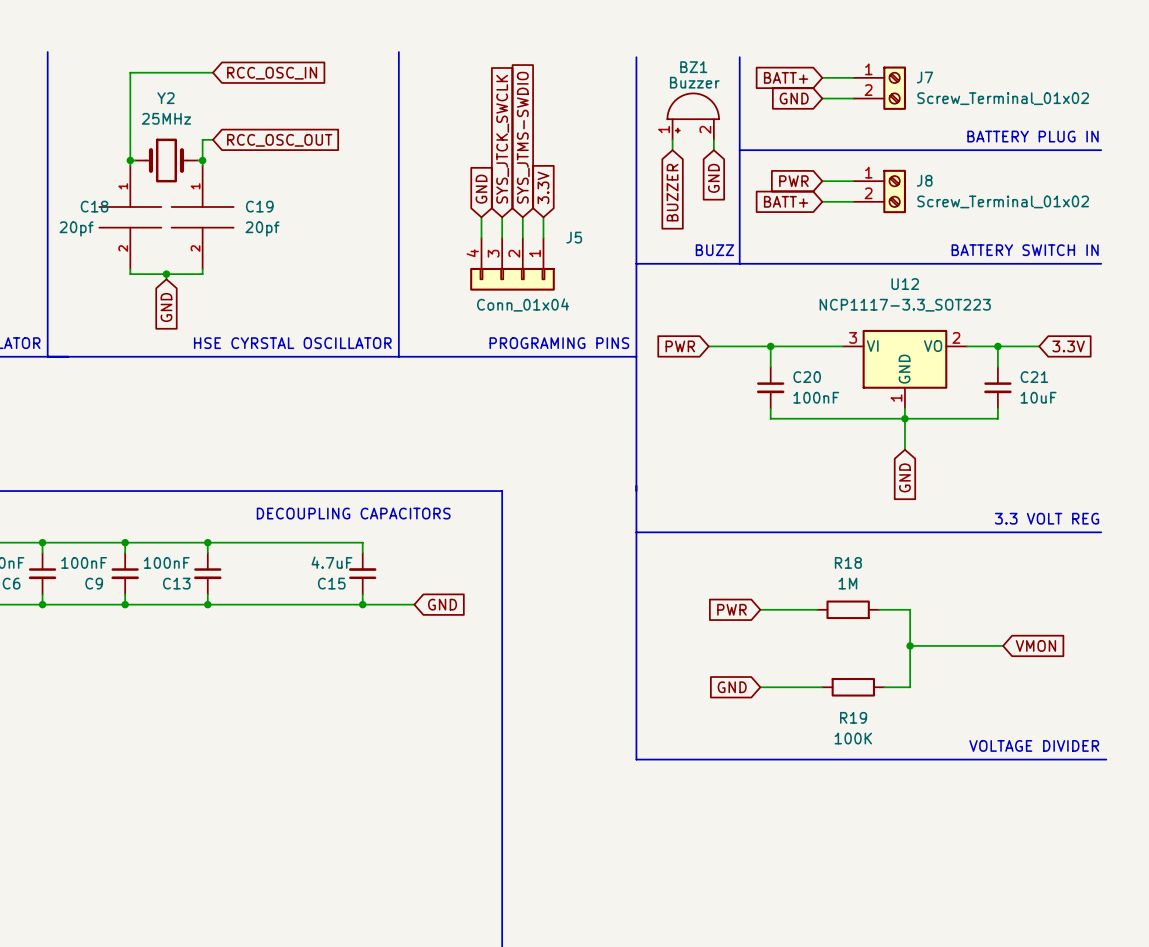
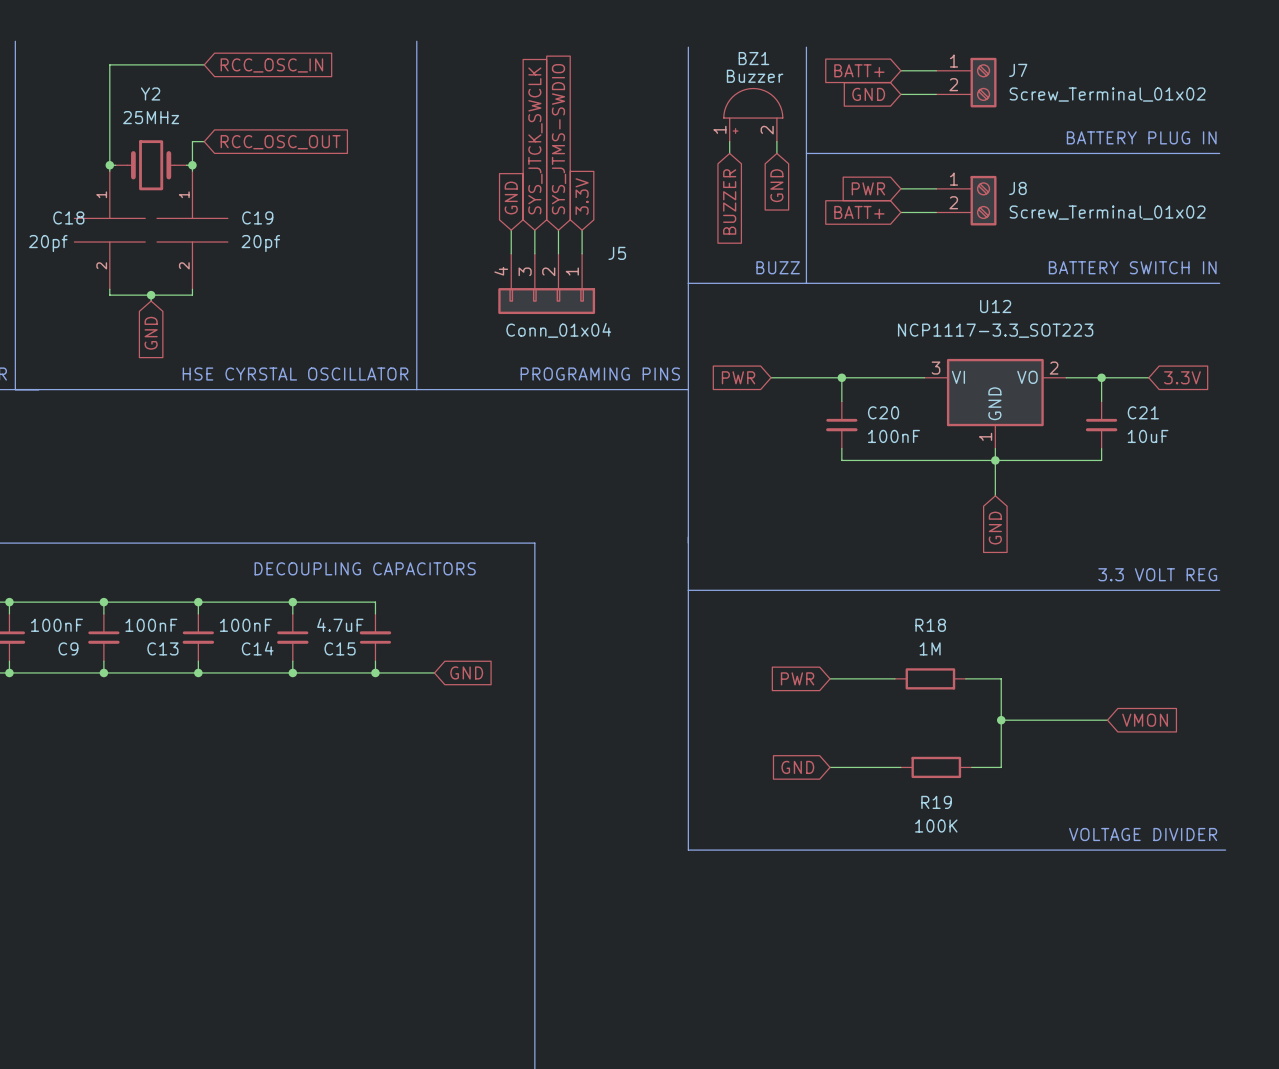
wire: none -> (292, 602) (292, 613)
junction: none -> (292, 602)
C14: none -> 100nF (292, 637)
wire: none -> (292, 661) (292, 672)
junction: none -> (292, 672)

